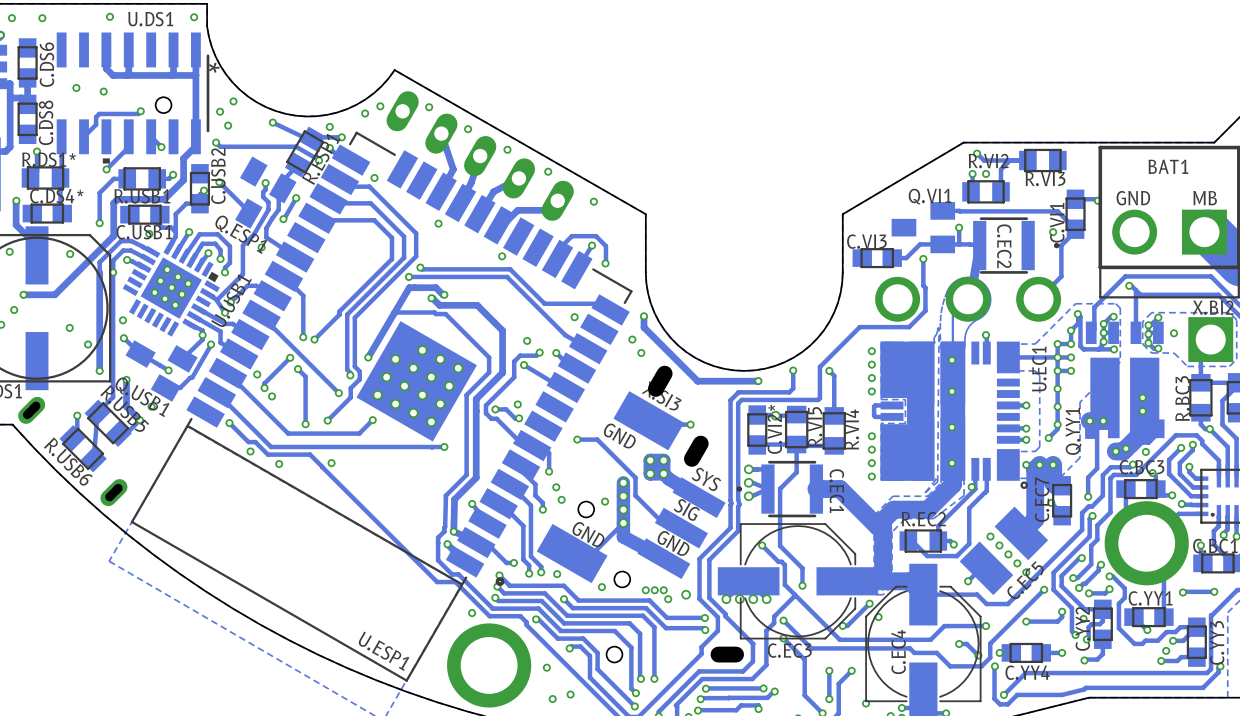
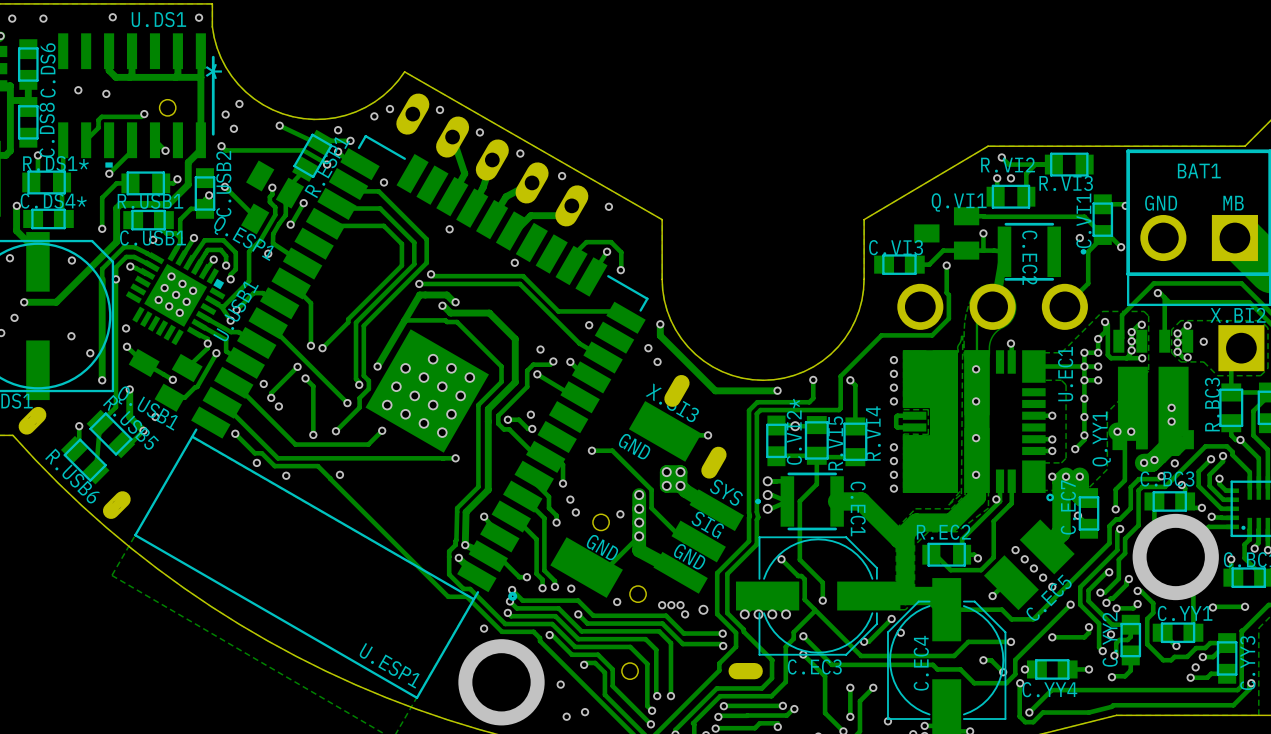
track: none -> (1108, 235) (1121, 247)
via: none -> (1121, 247)

